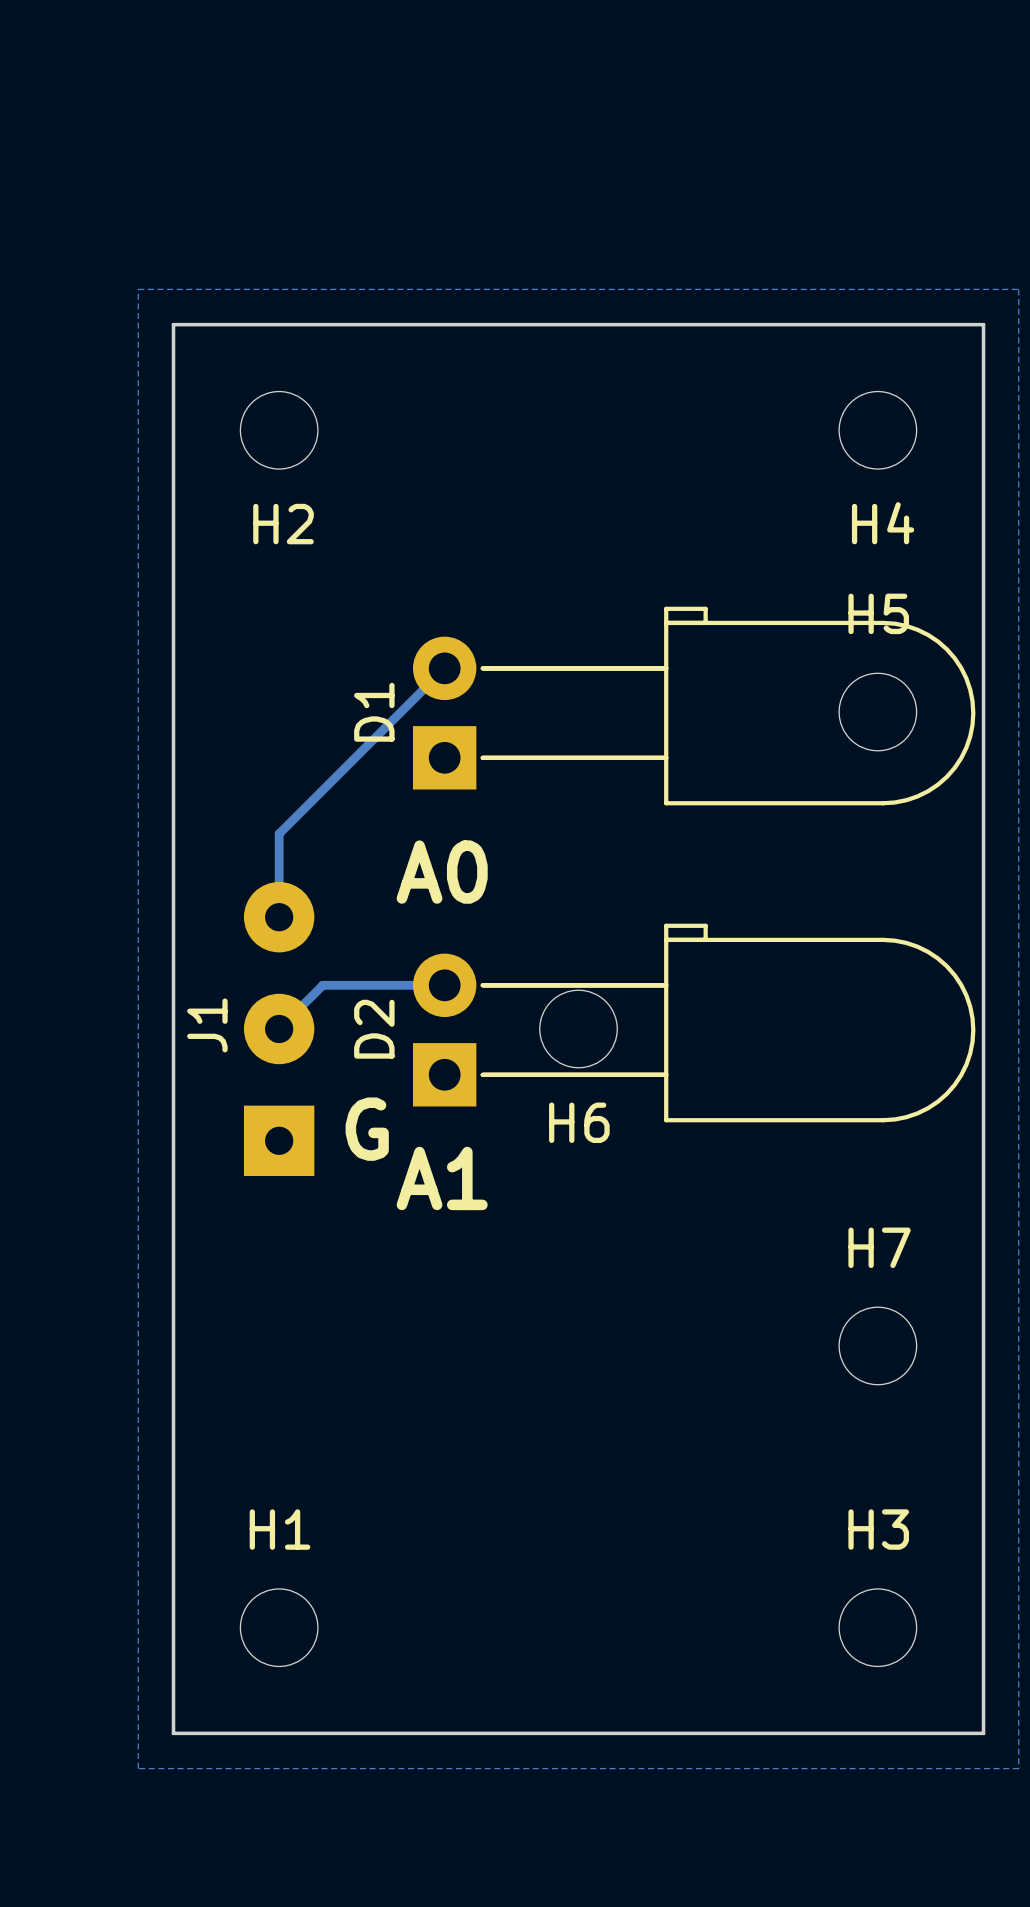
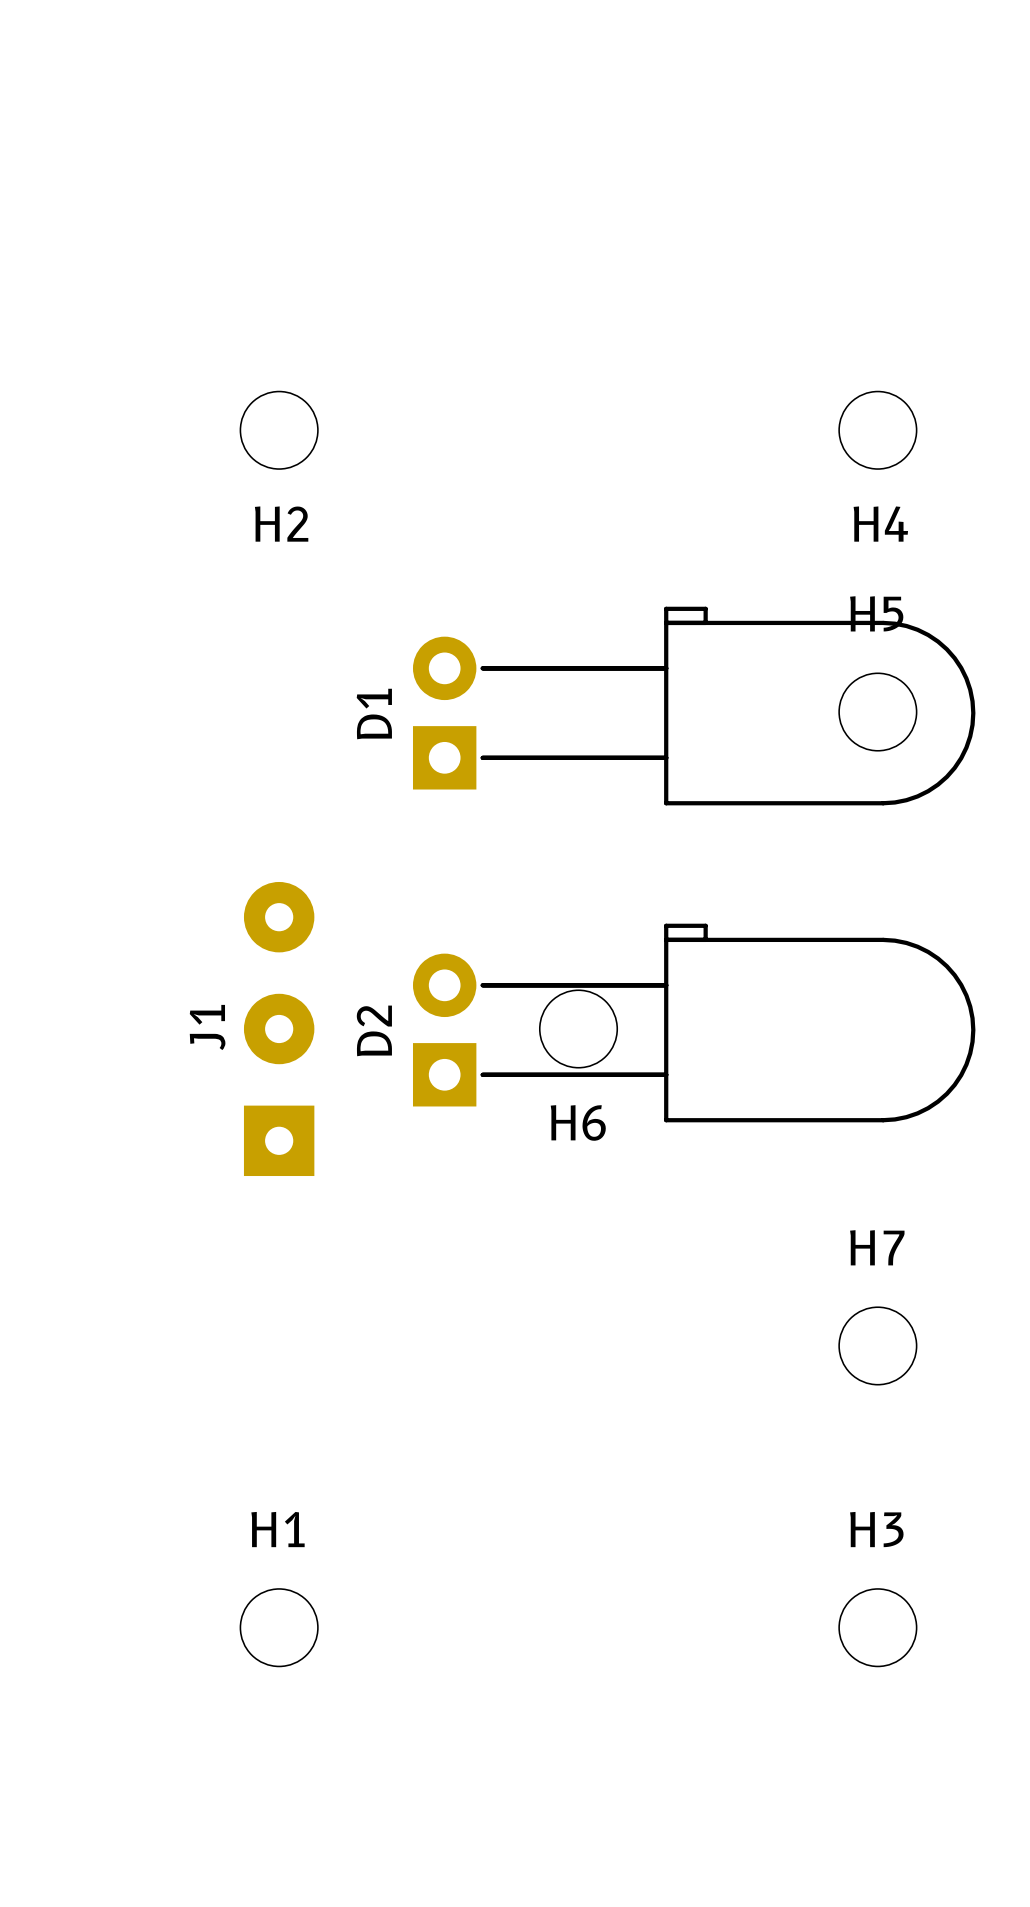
bottom zone outline: (138, 289) (1018, 289) (1018, 1768) (138, 1768) (138, 289) -> none
board edge: (173, 324) (173, 1733) (983, 1733) (983, 324) (173, 324) -> none
bottom track: (444, 668) (279, 833) (279, 917) -> none
text: A0 (442, 872) -> none
bottom track: (444, 985) (322, 985) (279, 1029) -> none
text: G (367, 1129) -> none
text: A1 (442, 1178) -> none

